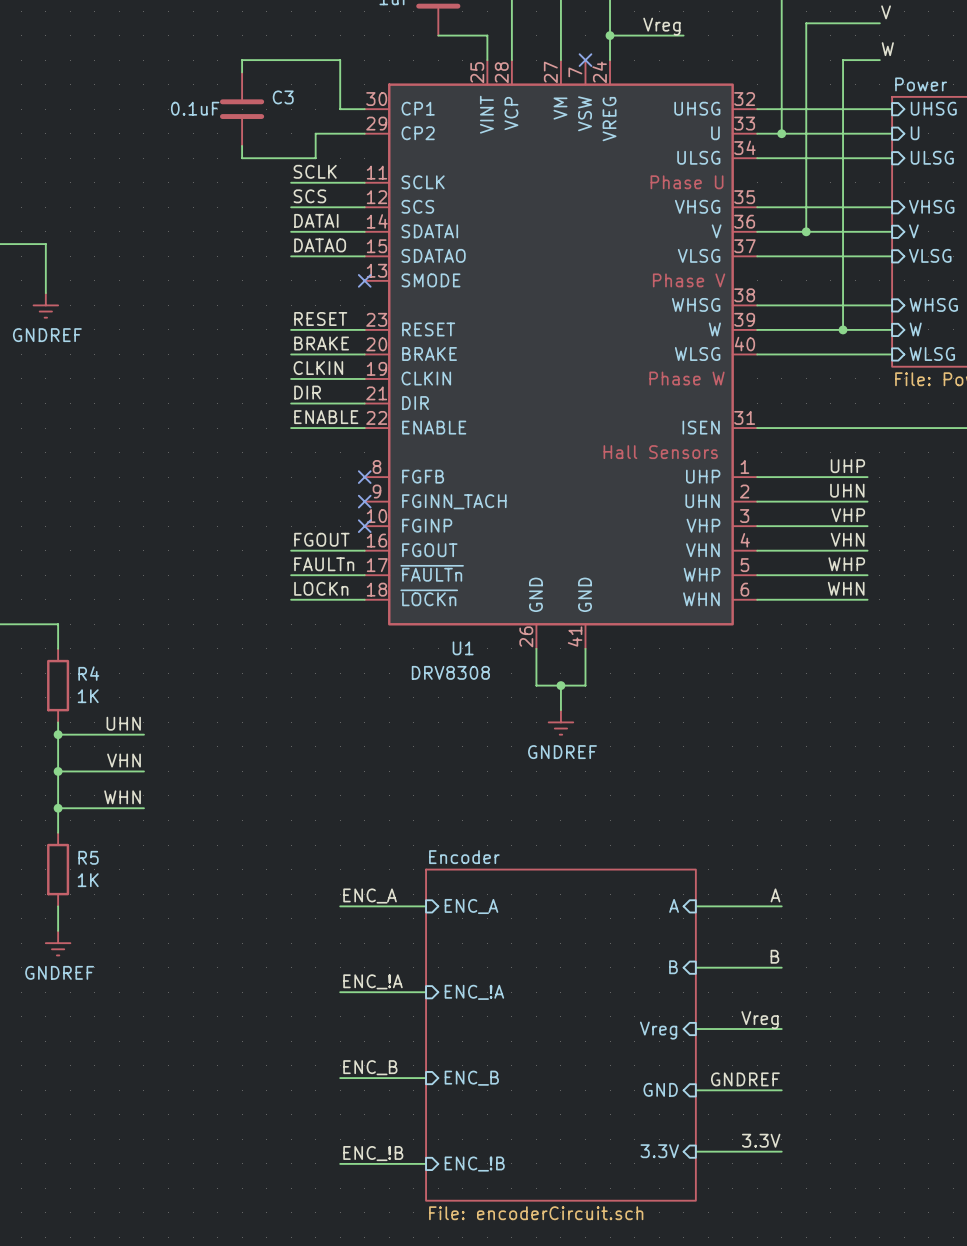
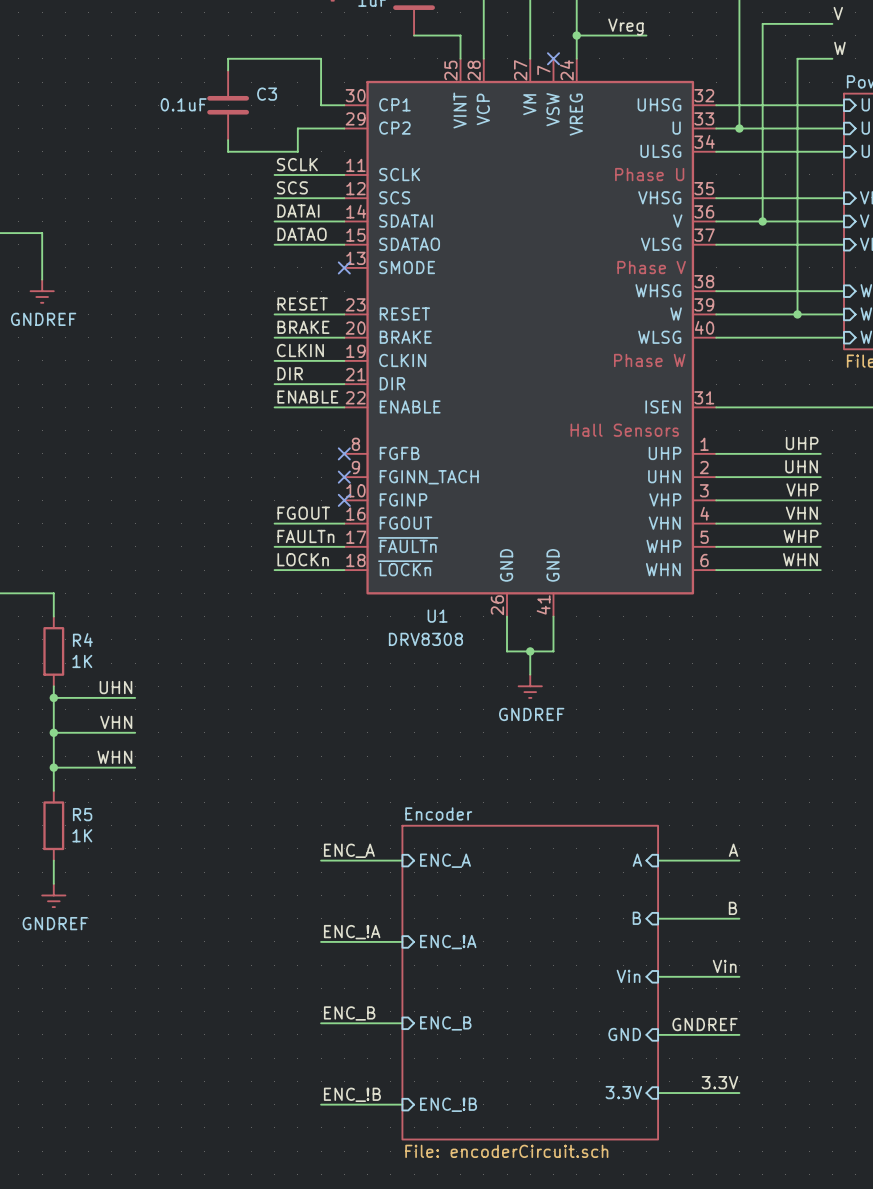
label: Vreg (760, 1020) -> Vin (724, 966)
sheet pin: Vreg (658, 1030) -> Vin (628, 976)

